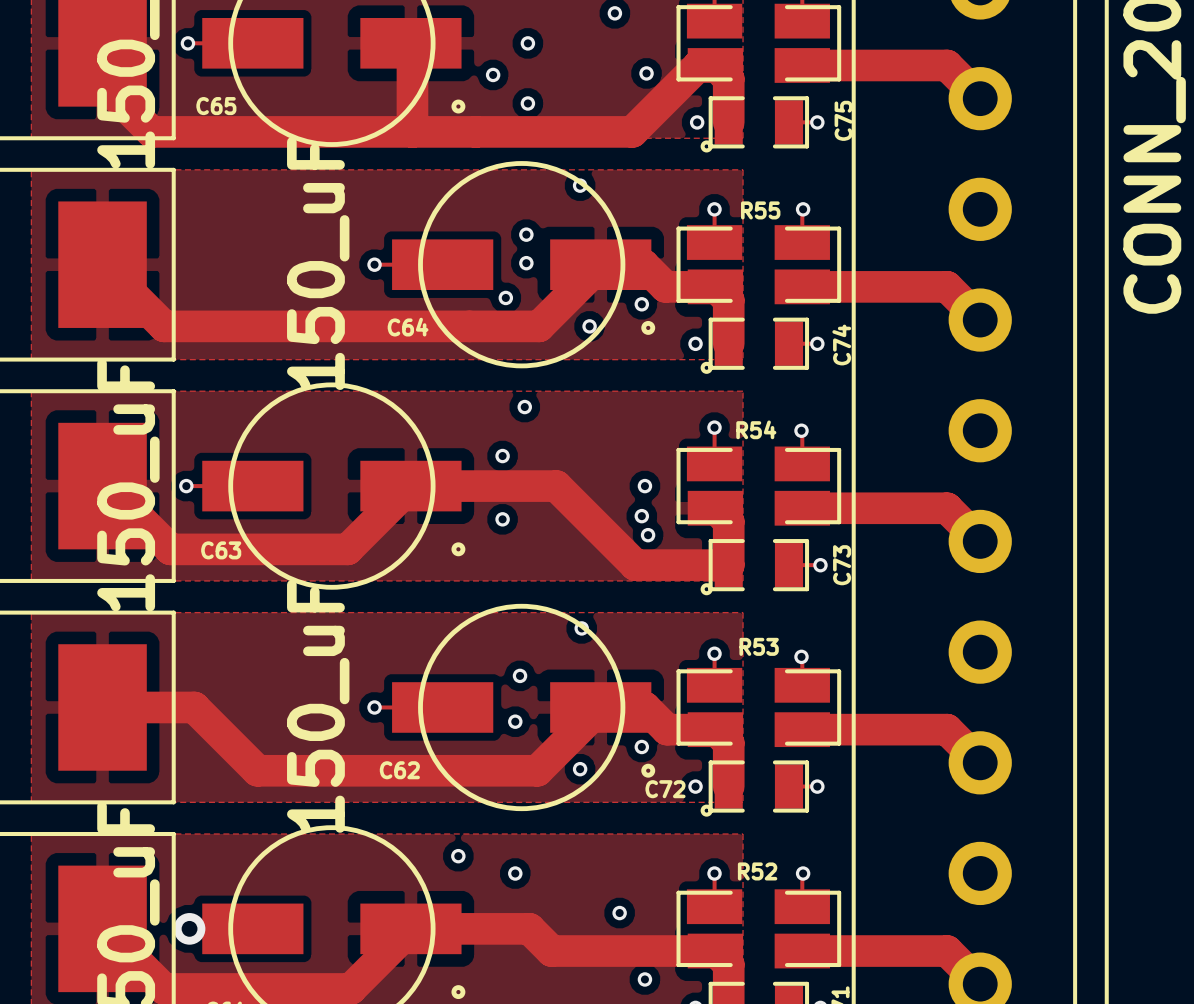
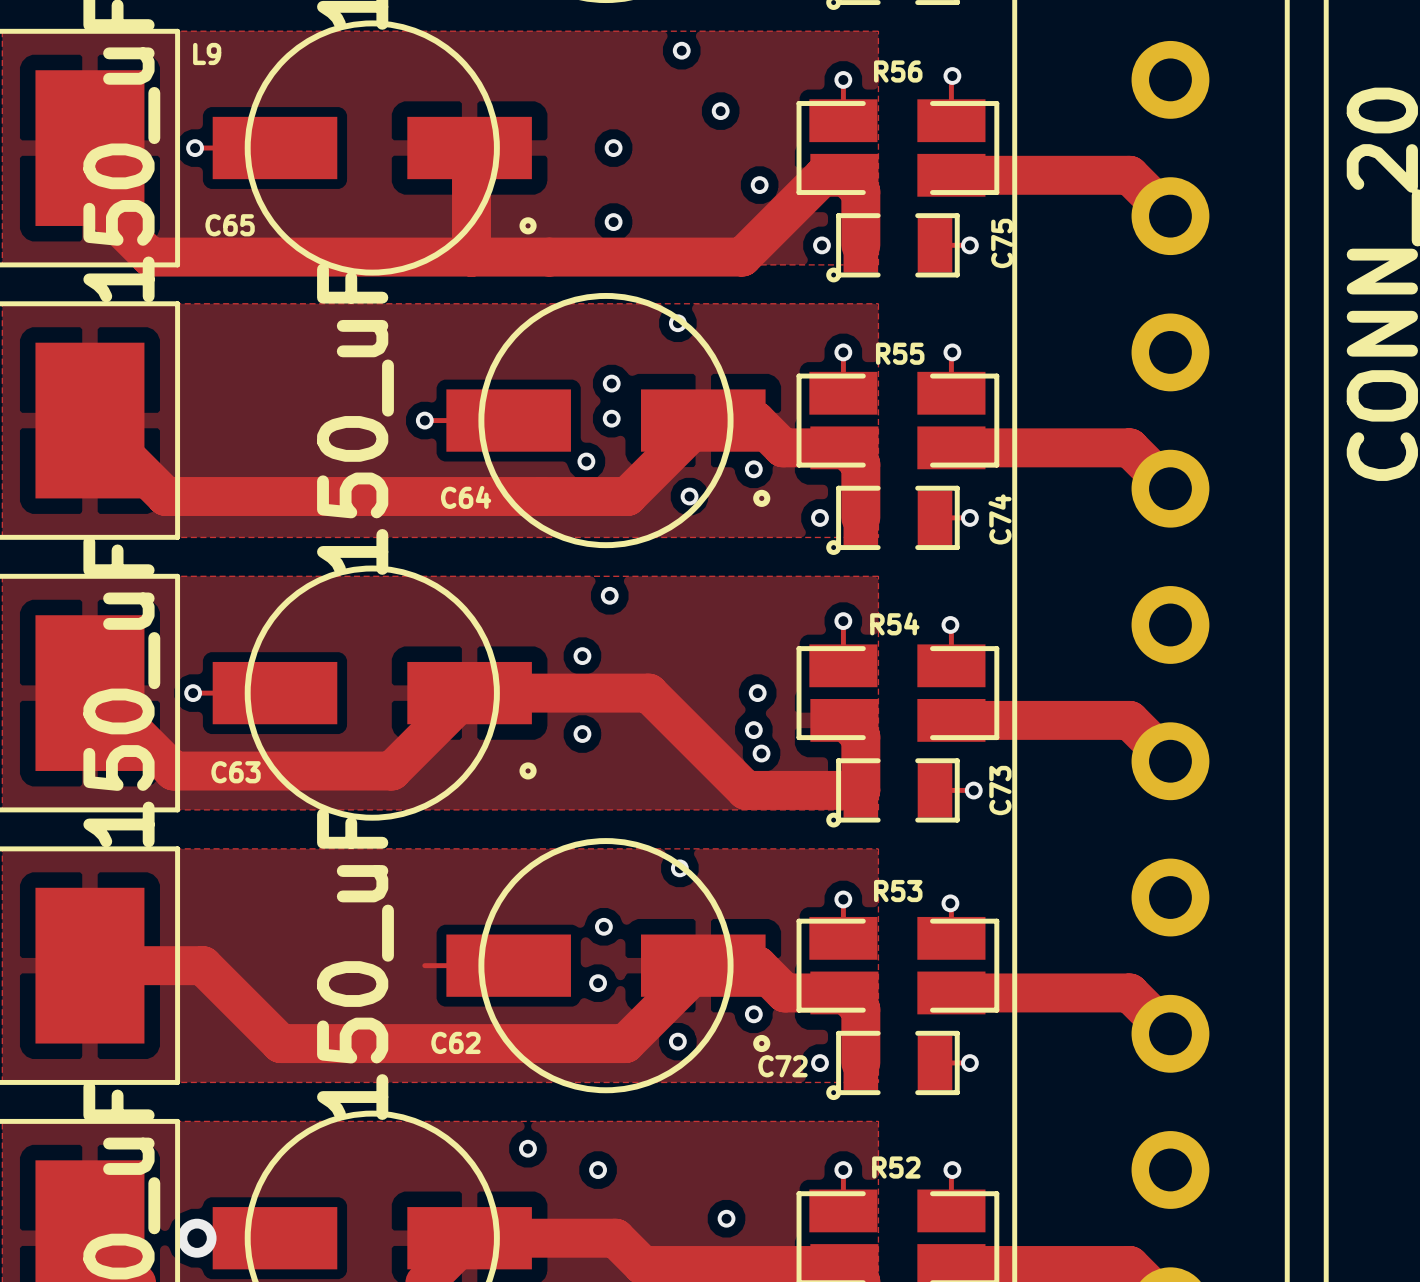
via: (493, 74) -> none
via: (374, 707) -> none

